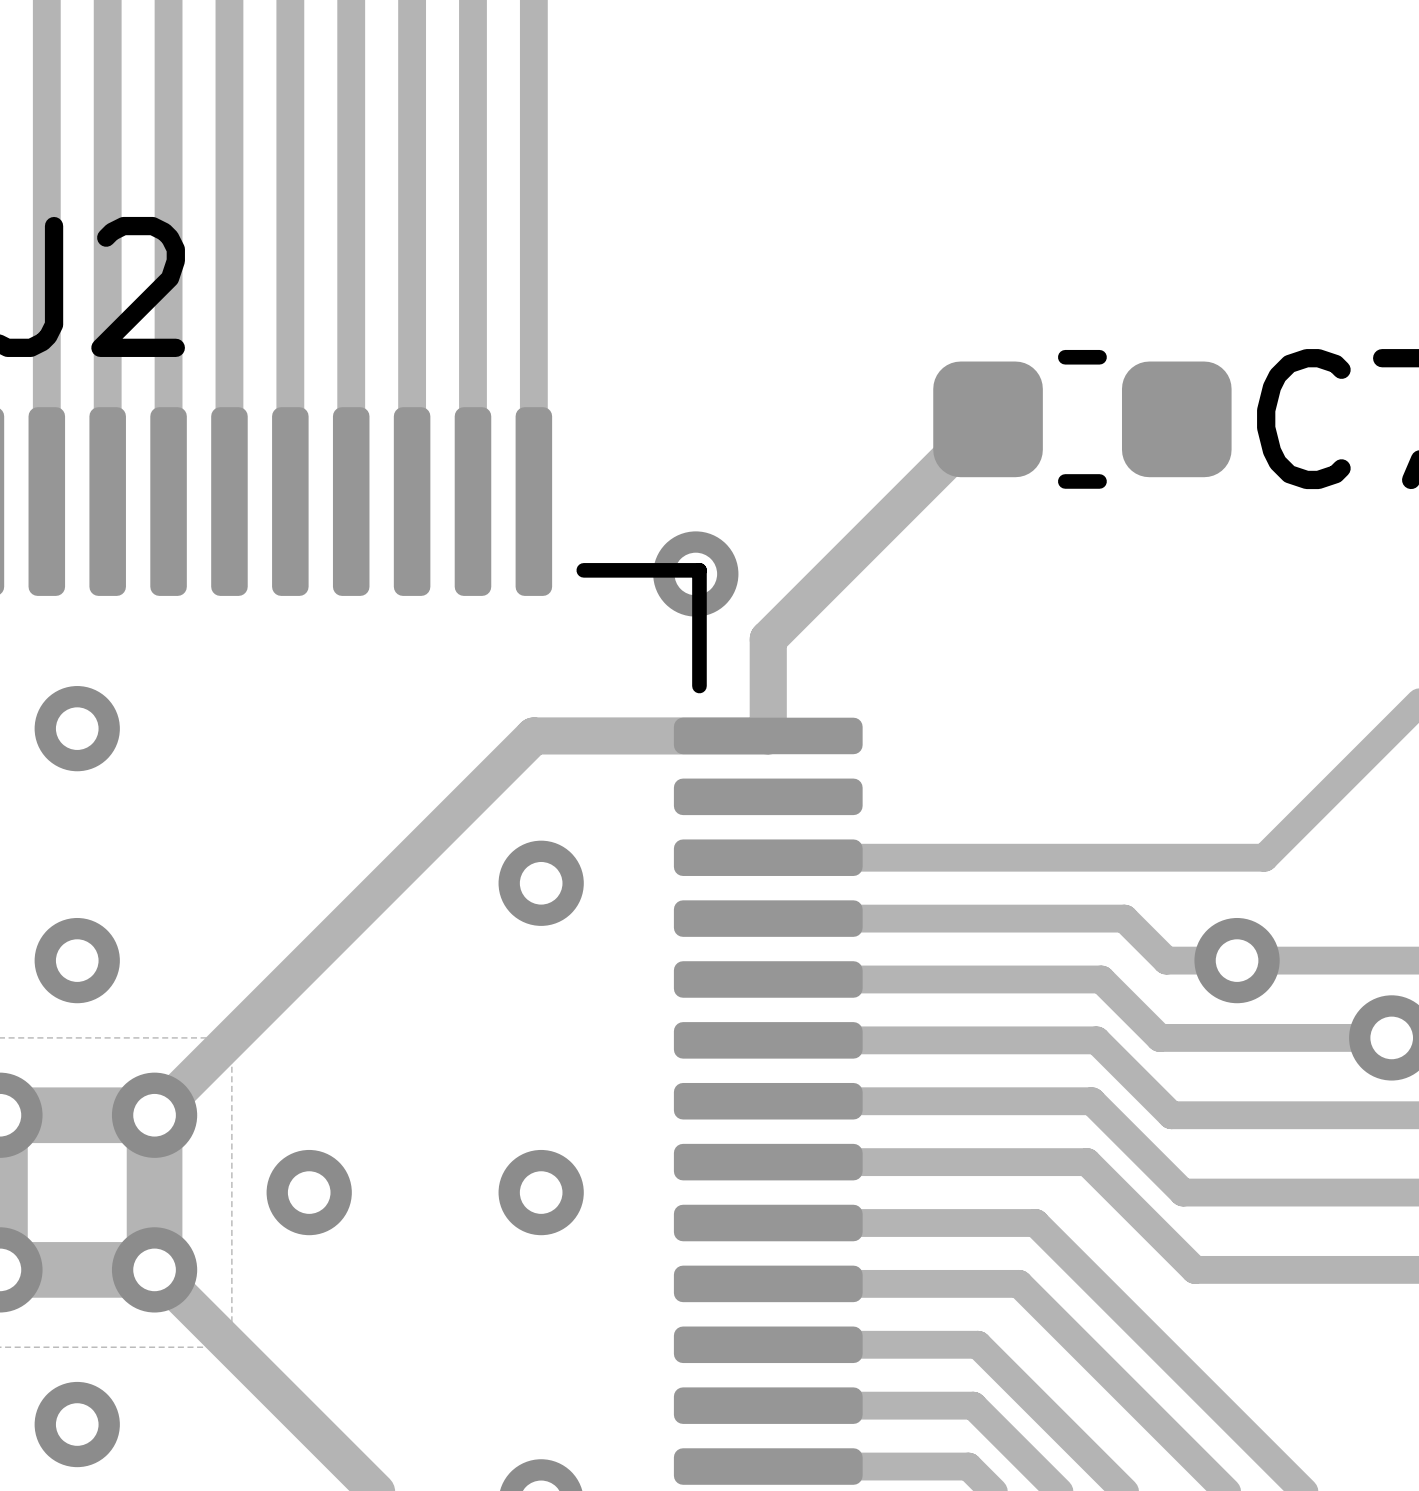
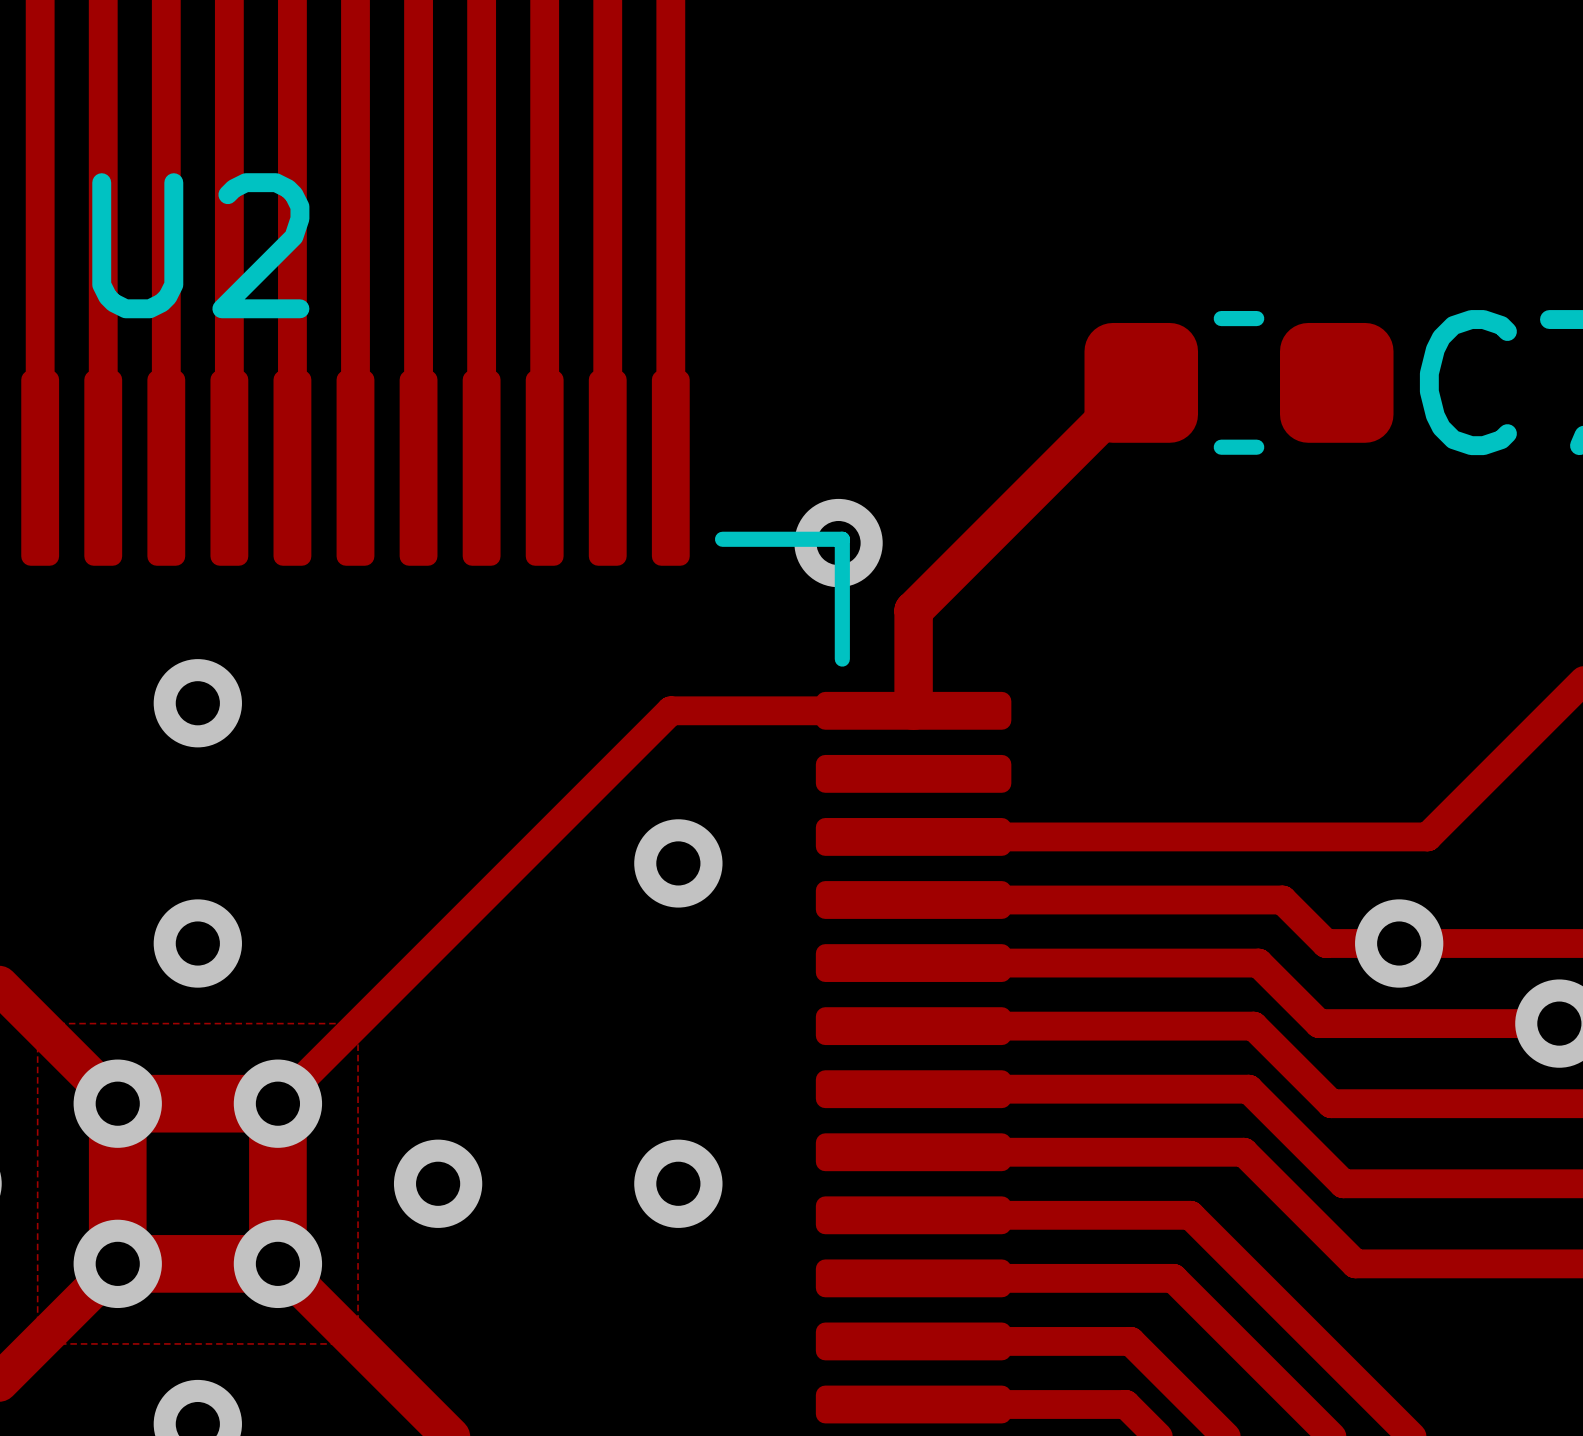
track width: thick (768, 735) (533, 735) (154, 1115) -> thin (913, 710) (670, 710) (277, 1103)

